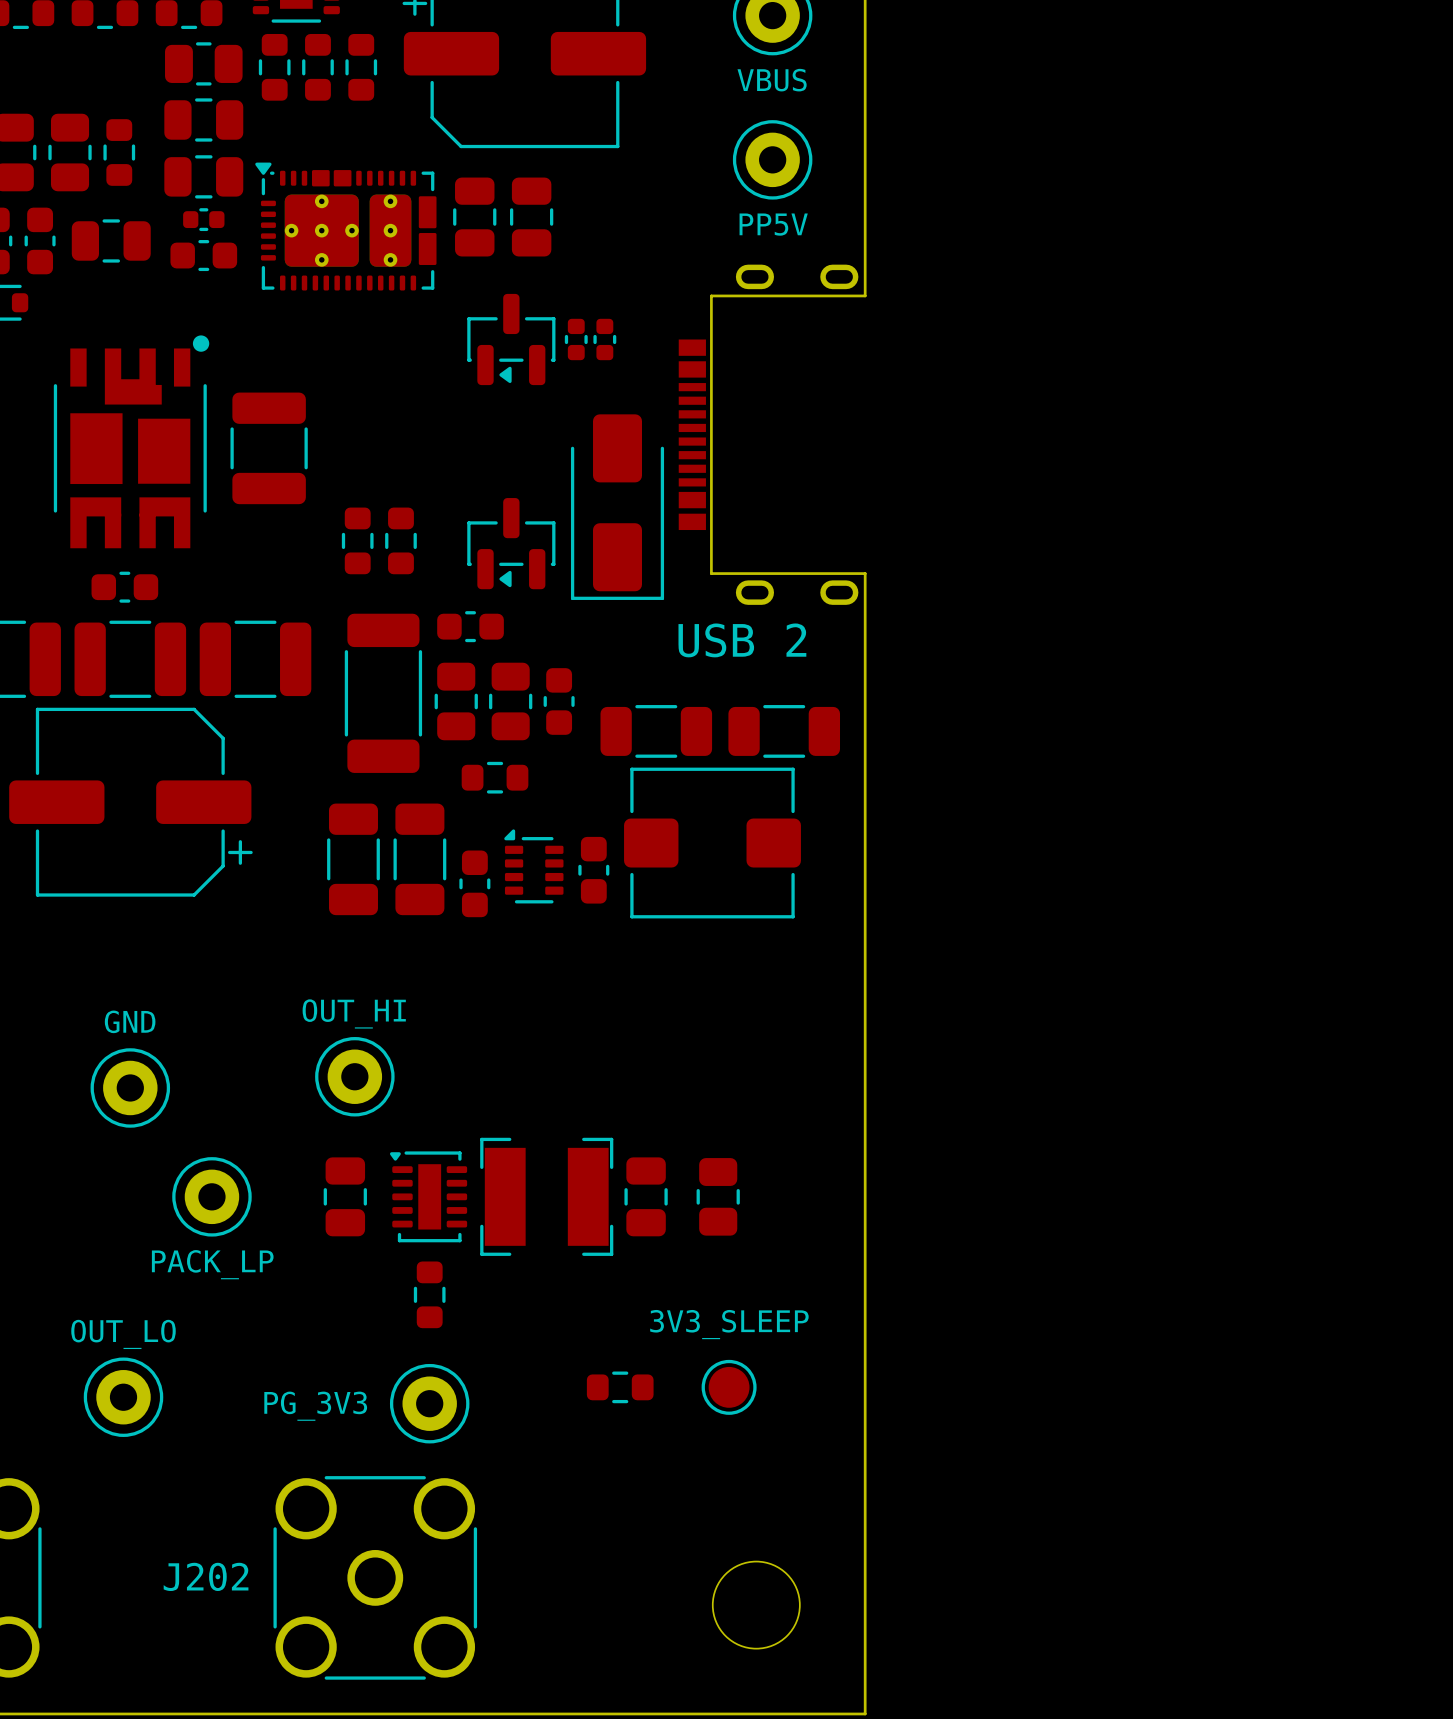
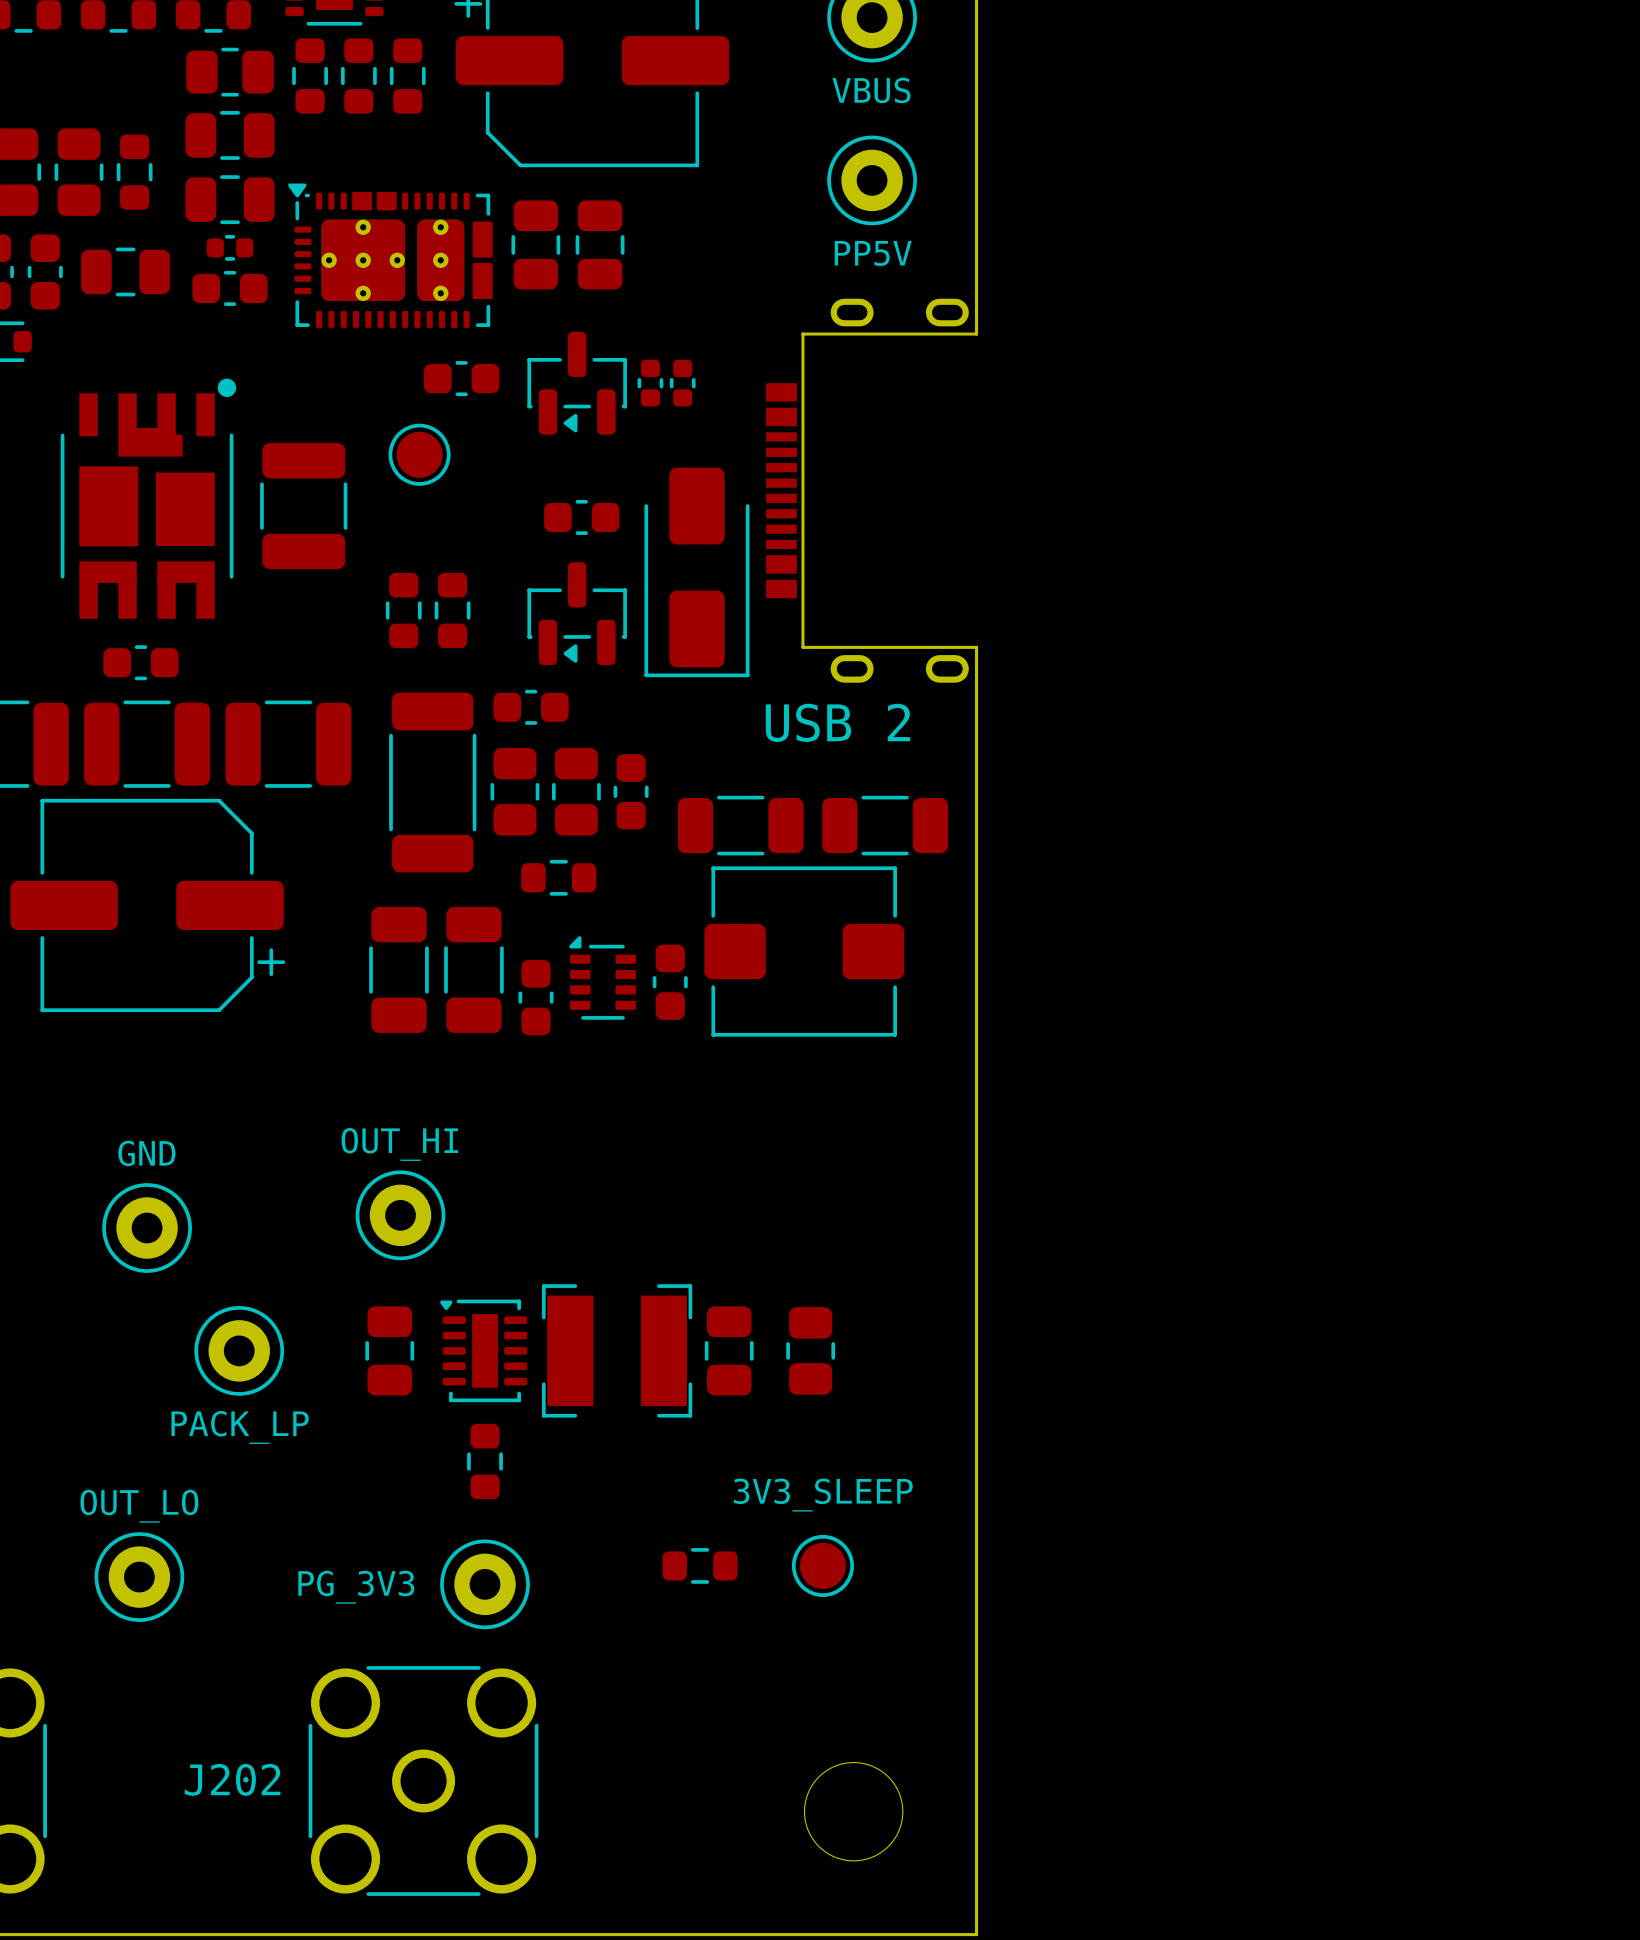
part: none -> (461, 378)
part: none -> (419, 454)
part: none -> (581, 517)

